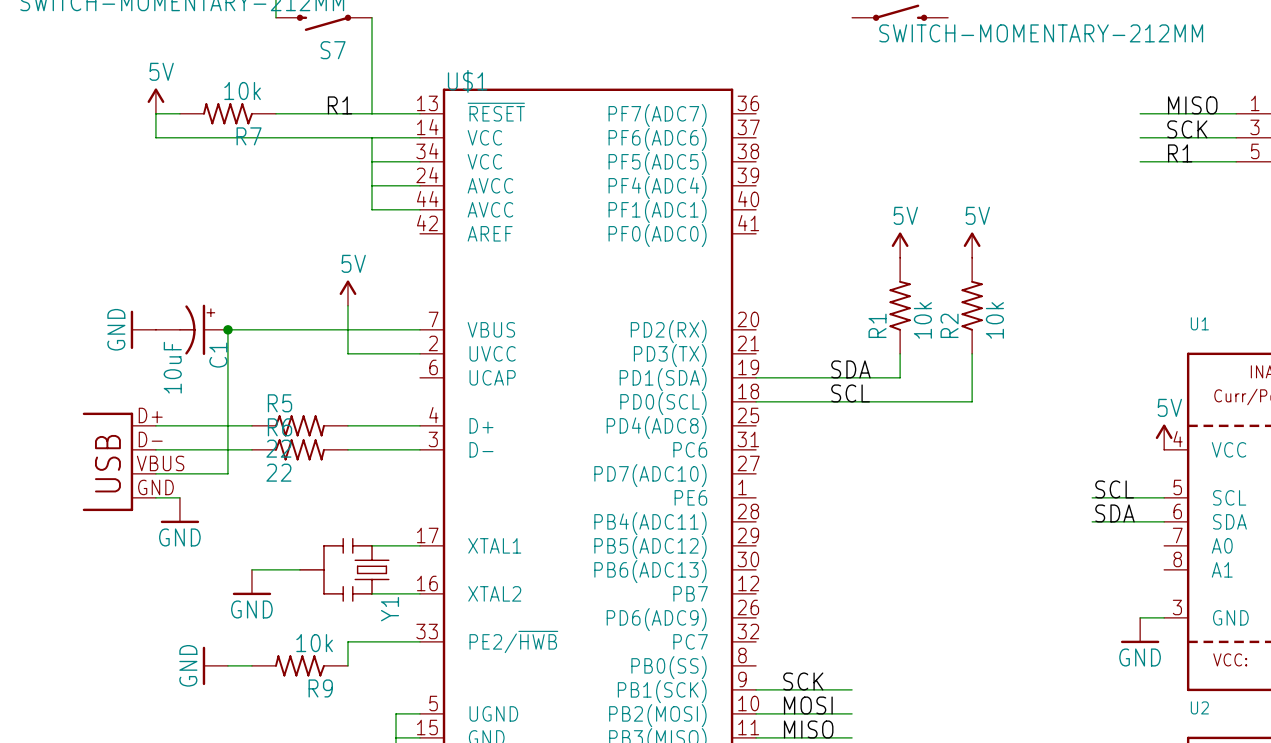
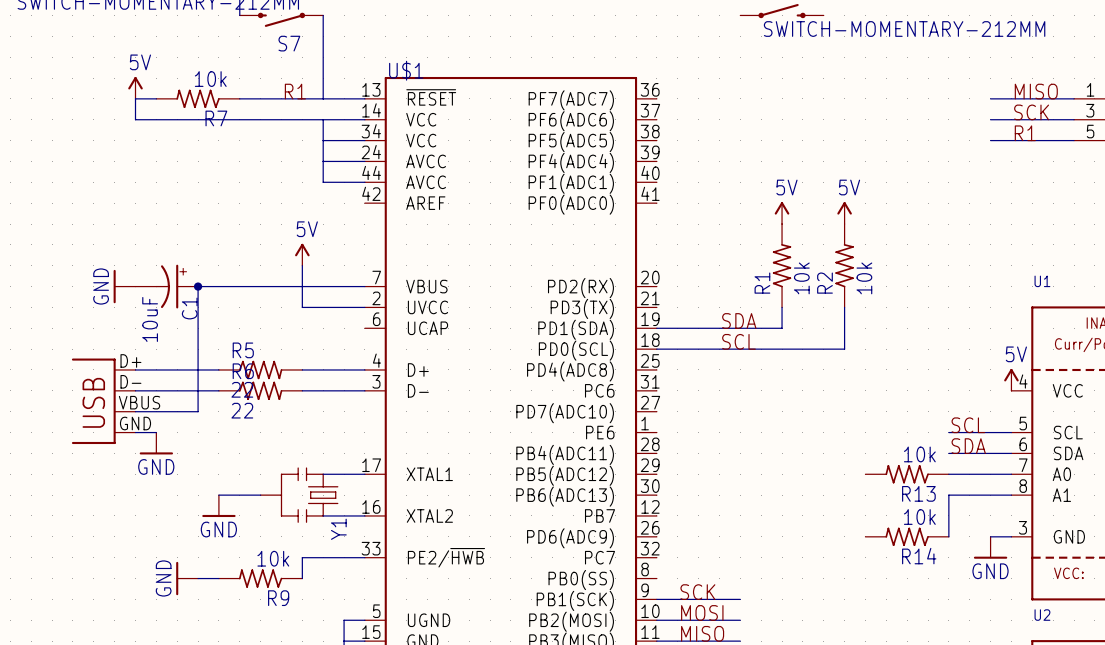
R13: none -> 10k (907, 474)
wire: none -> (948, 474) (1011, 474)
wire: none -> (1011, 495) (948, 495) (948, 536)
R14: none -> 10k (907, 536)

